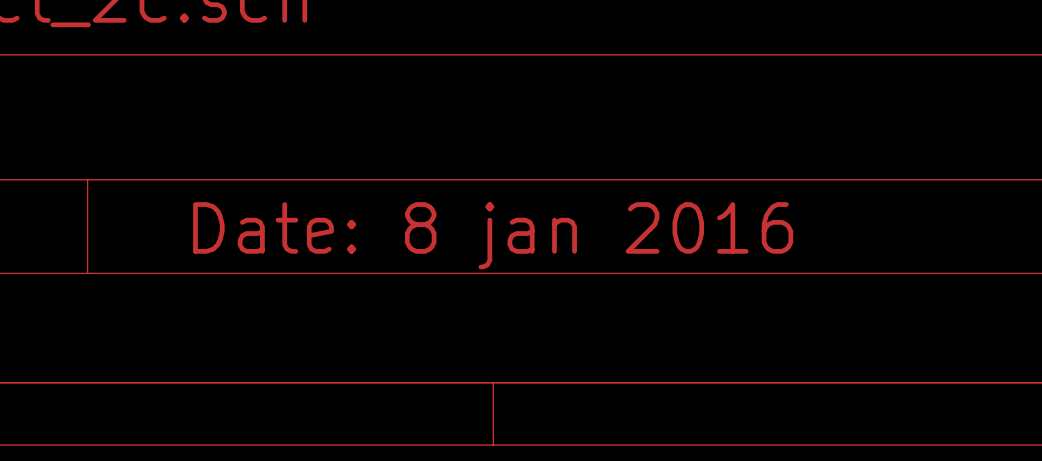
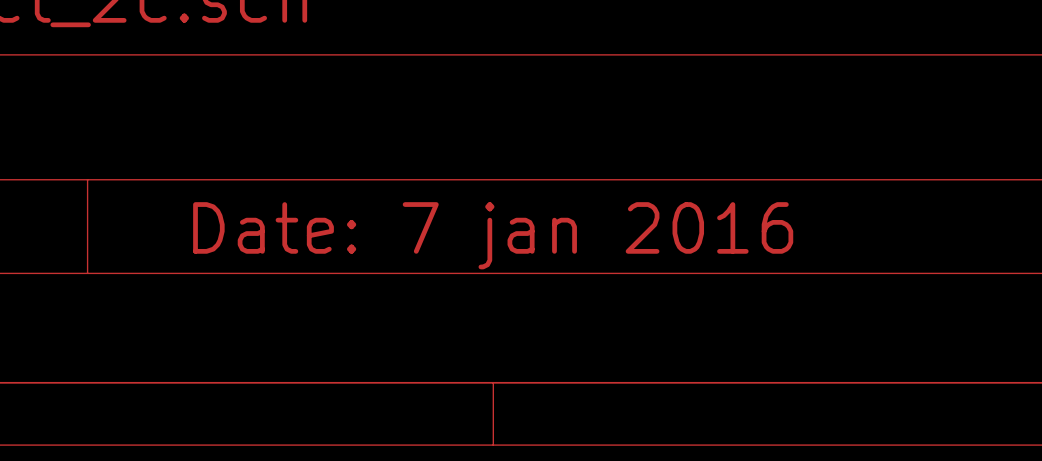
title block: Date: 8 jan 2016 (493, 235) -> Date: 7 jan 2016 (493, 235)

